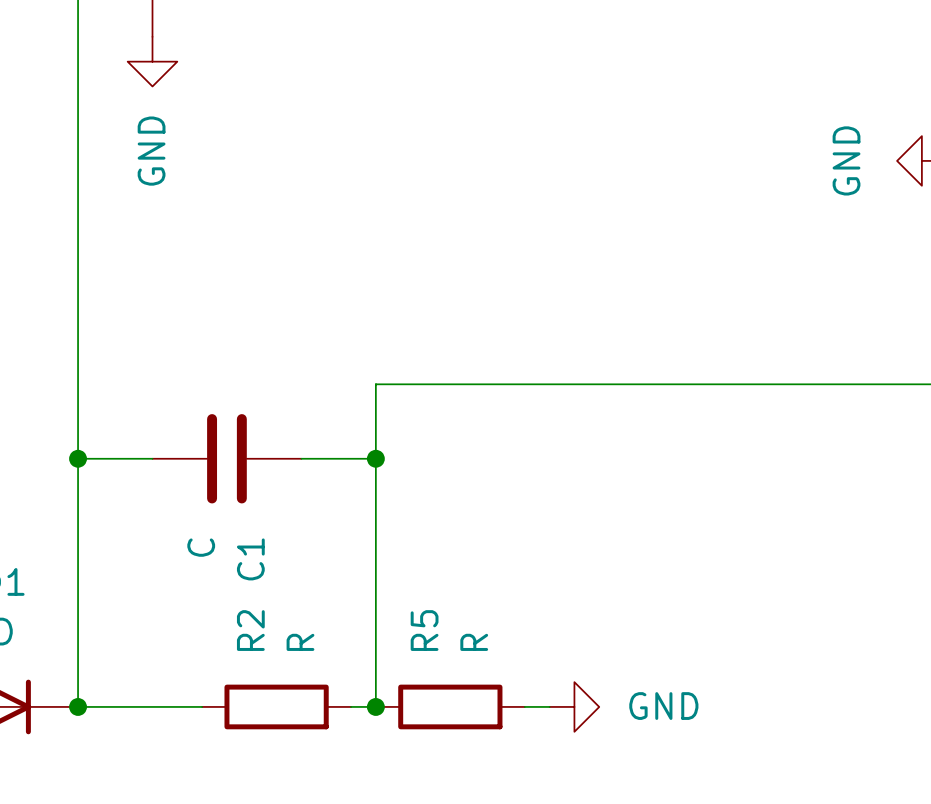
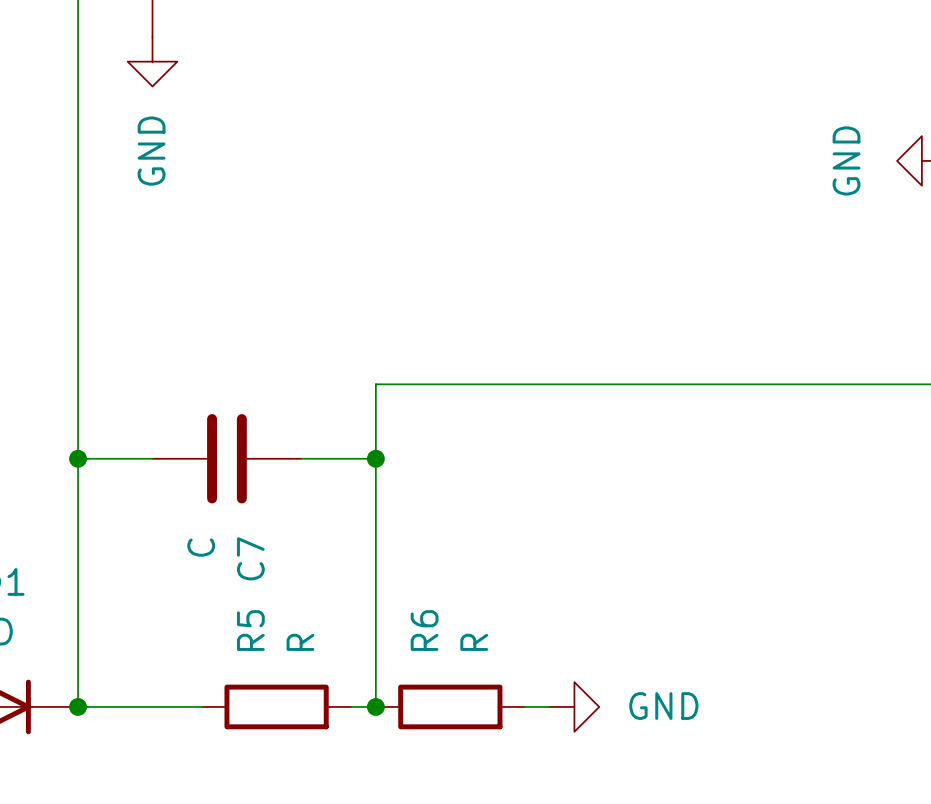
C1 name: C1 (250, 559) -> C7 (250, 558)
R2 name: R2 (250, 630) -> R5 (250, 630)
R5 name: R5 (424, 630) -> R6 (424, 630)

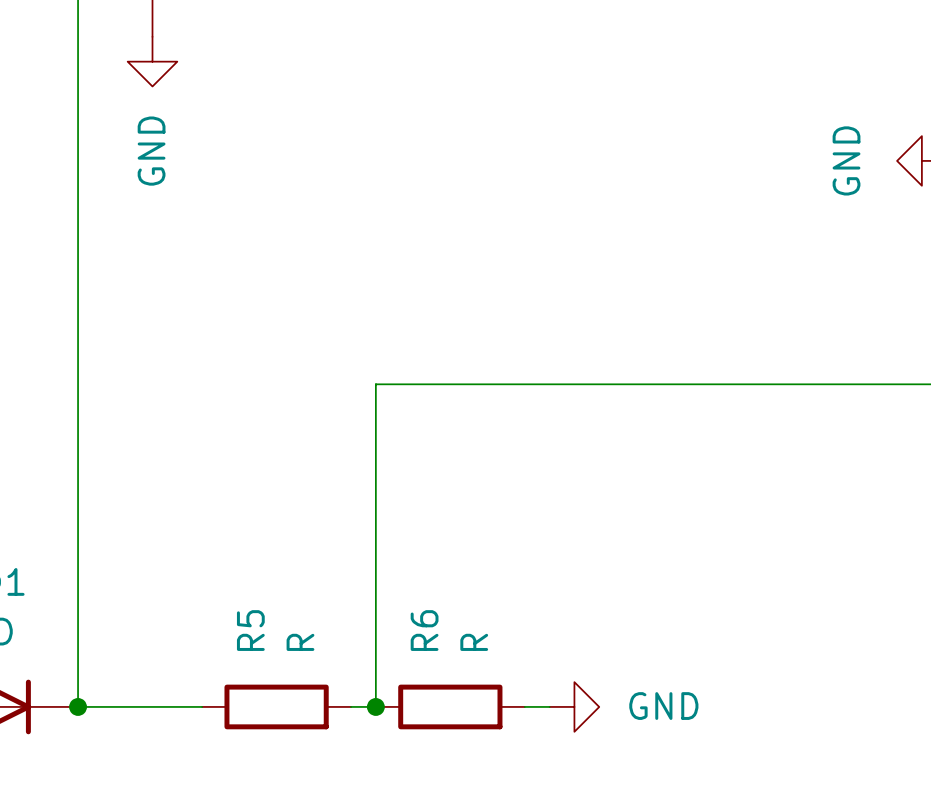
wire: (78, 458) (152, 458) -> none
junction: (78, 458) -> none
C7: C (226, 458) -> none
wire: (301, 458) (375, 458) -> none
junction: (375, 458) -> none

